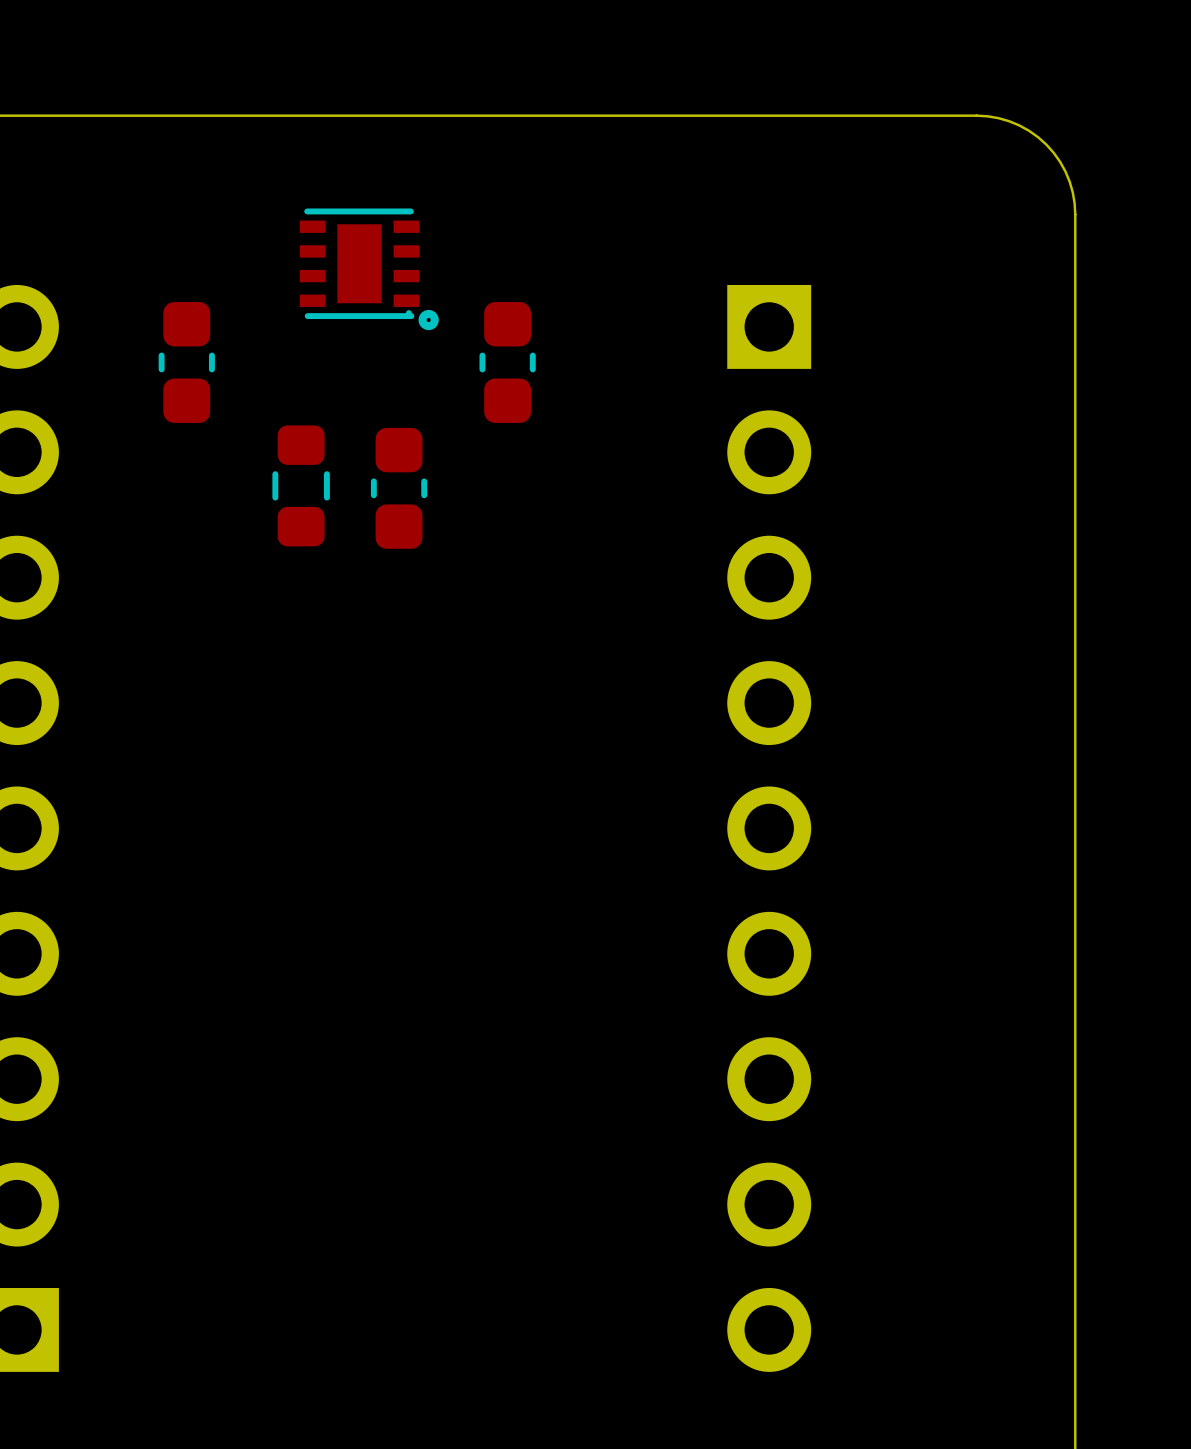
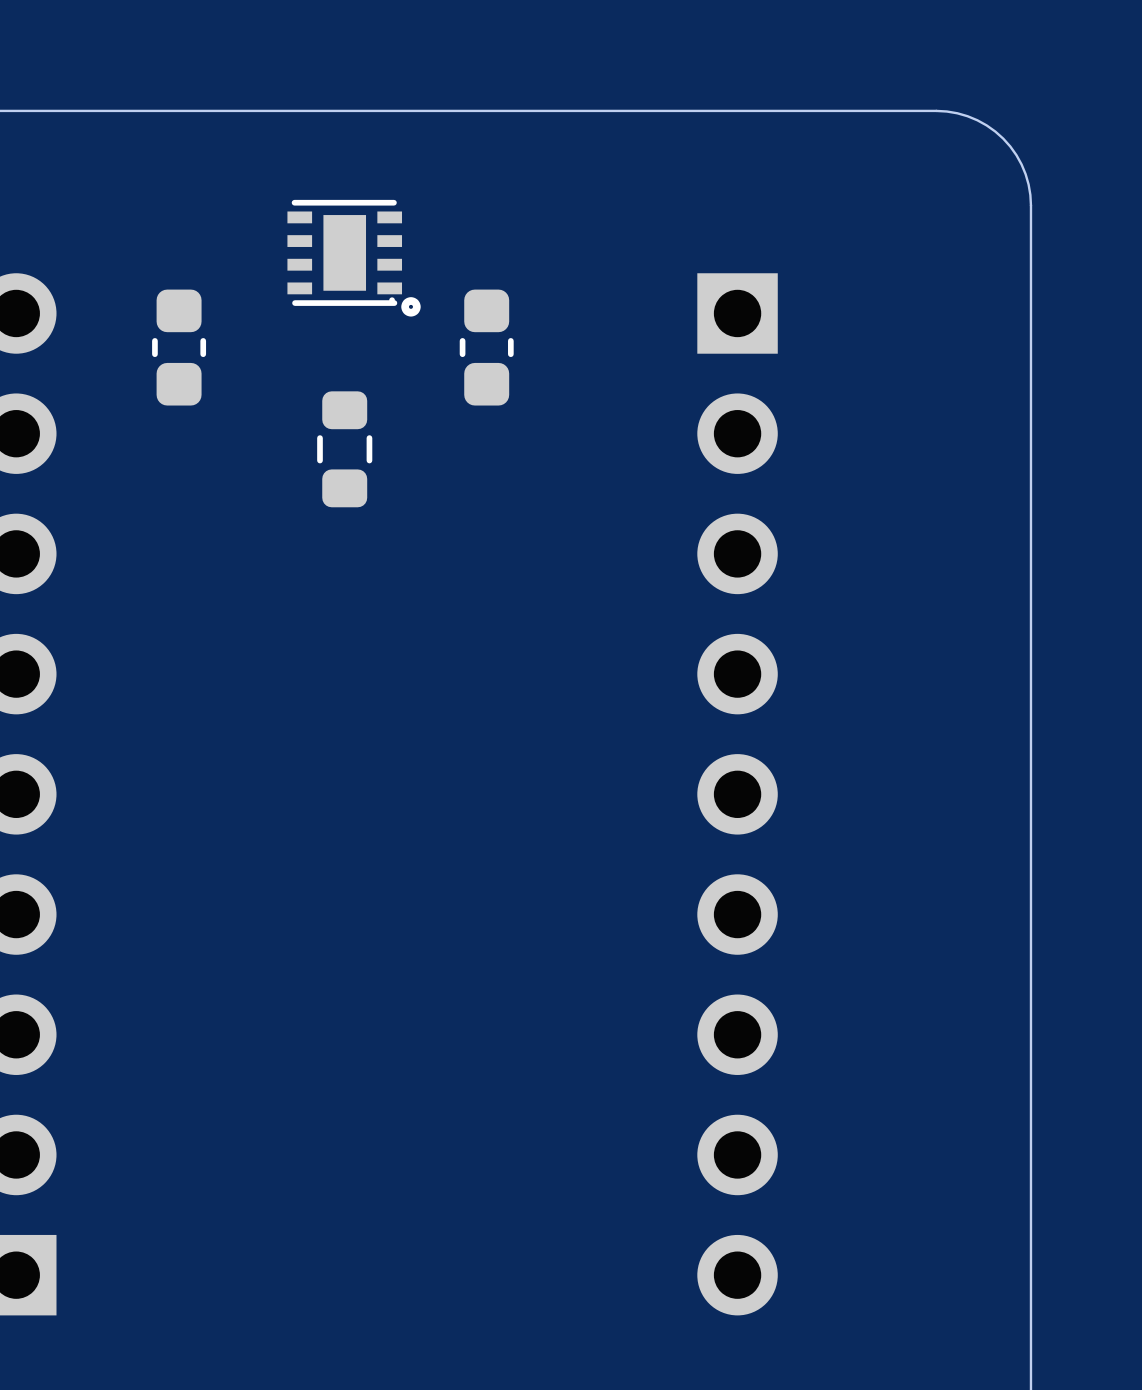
part position: (301, 485) -> (344, 449)
part: (399, 488) -> none

